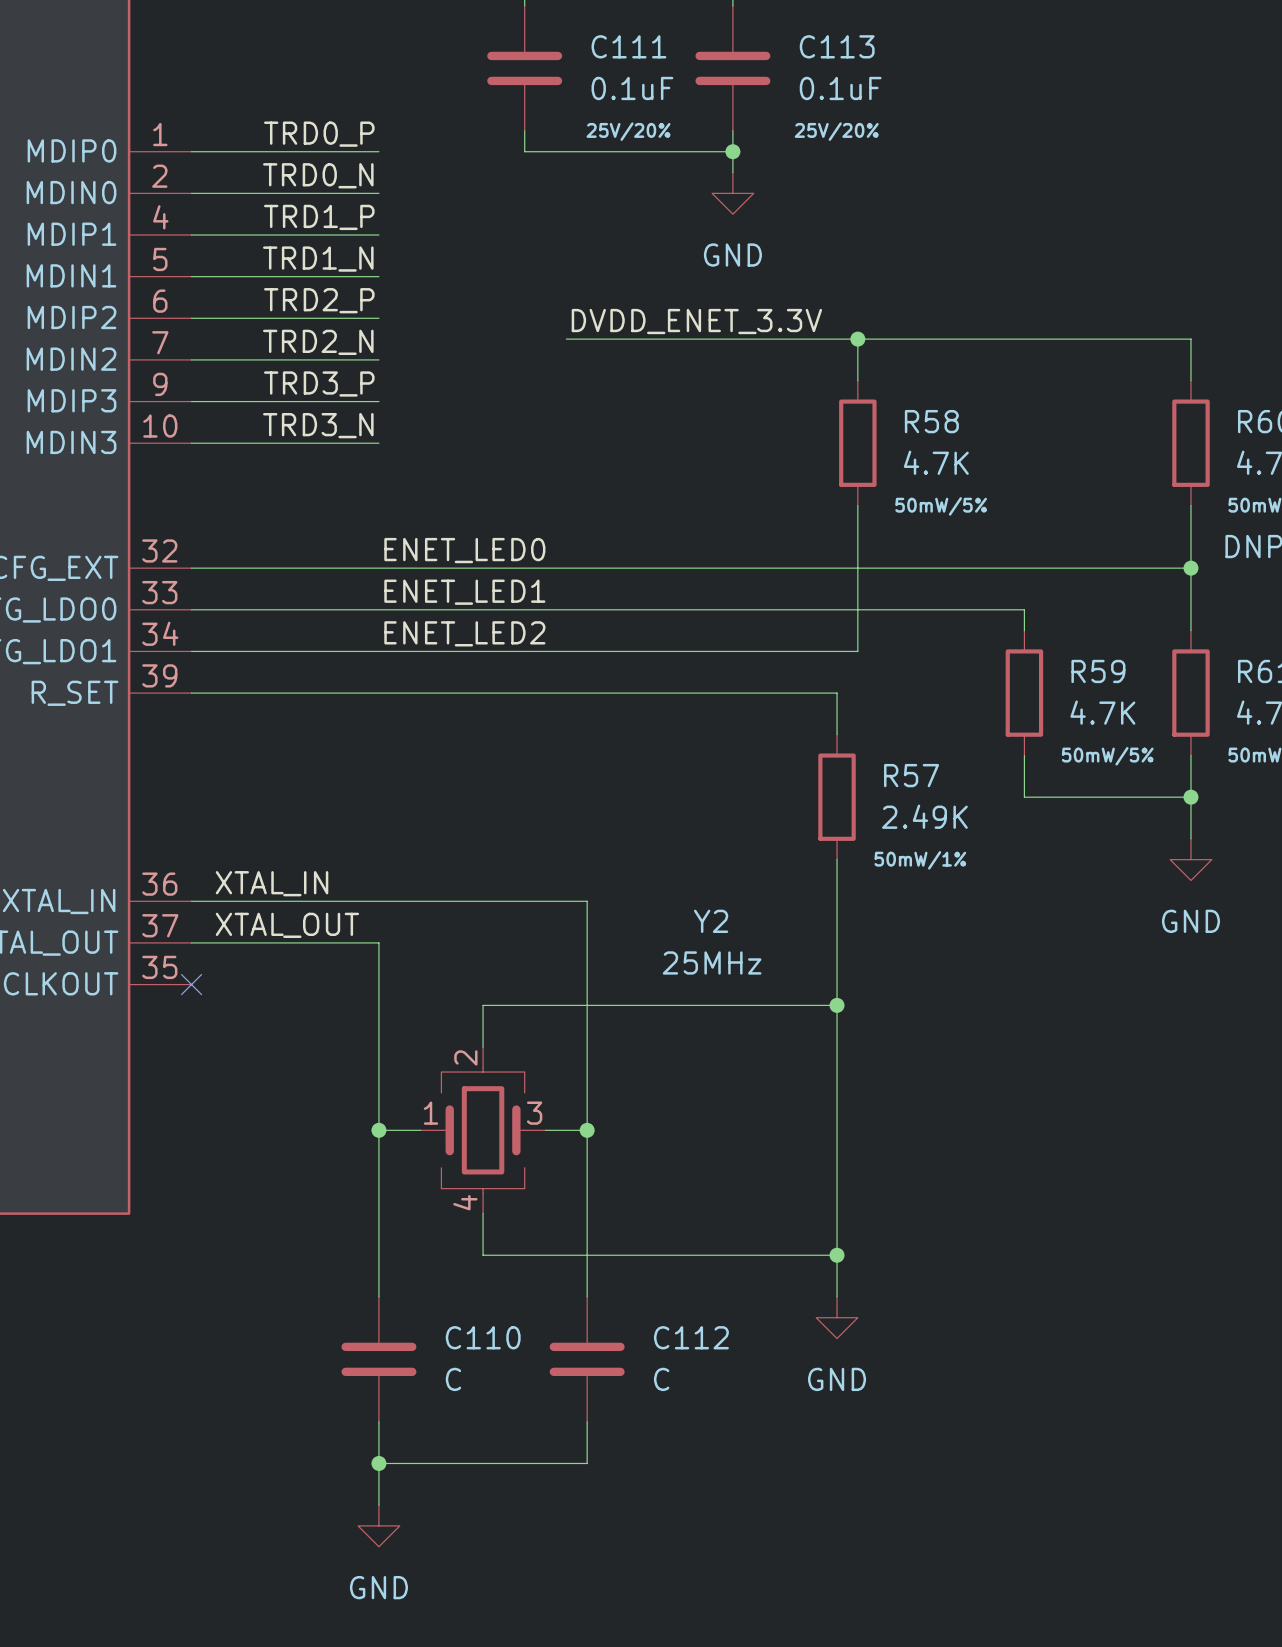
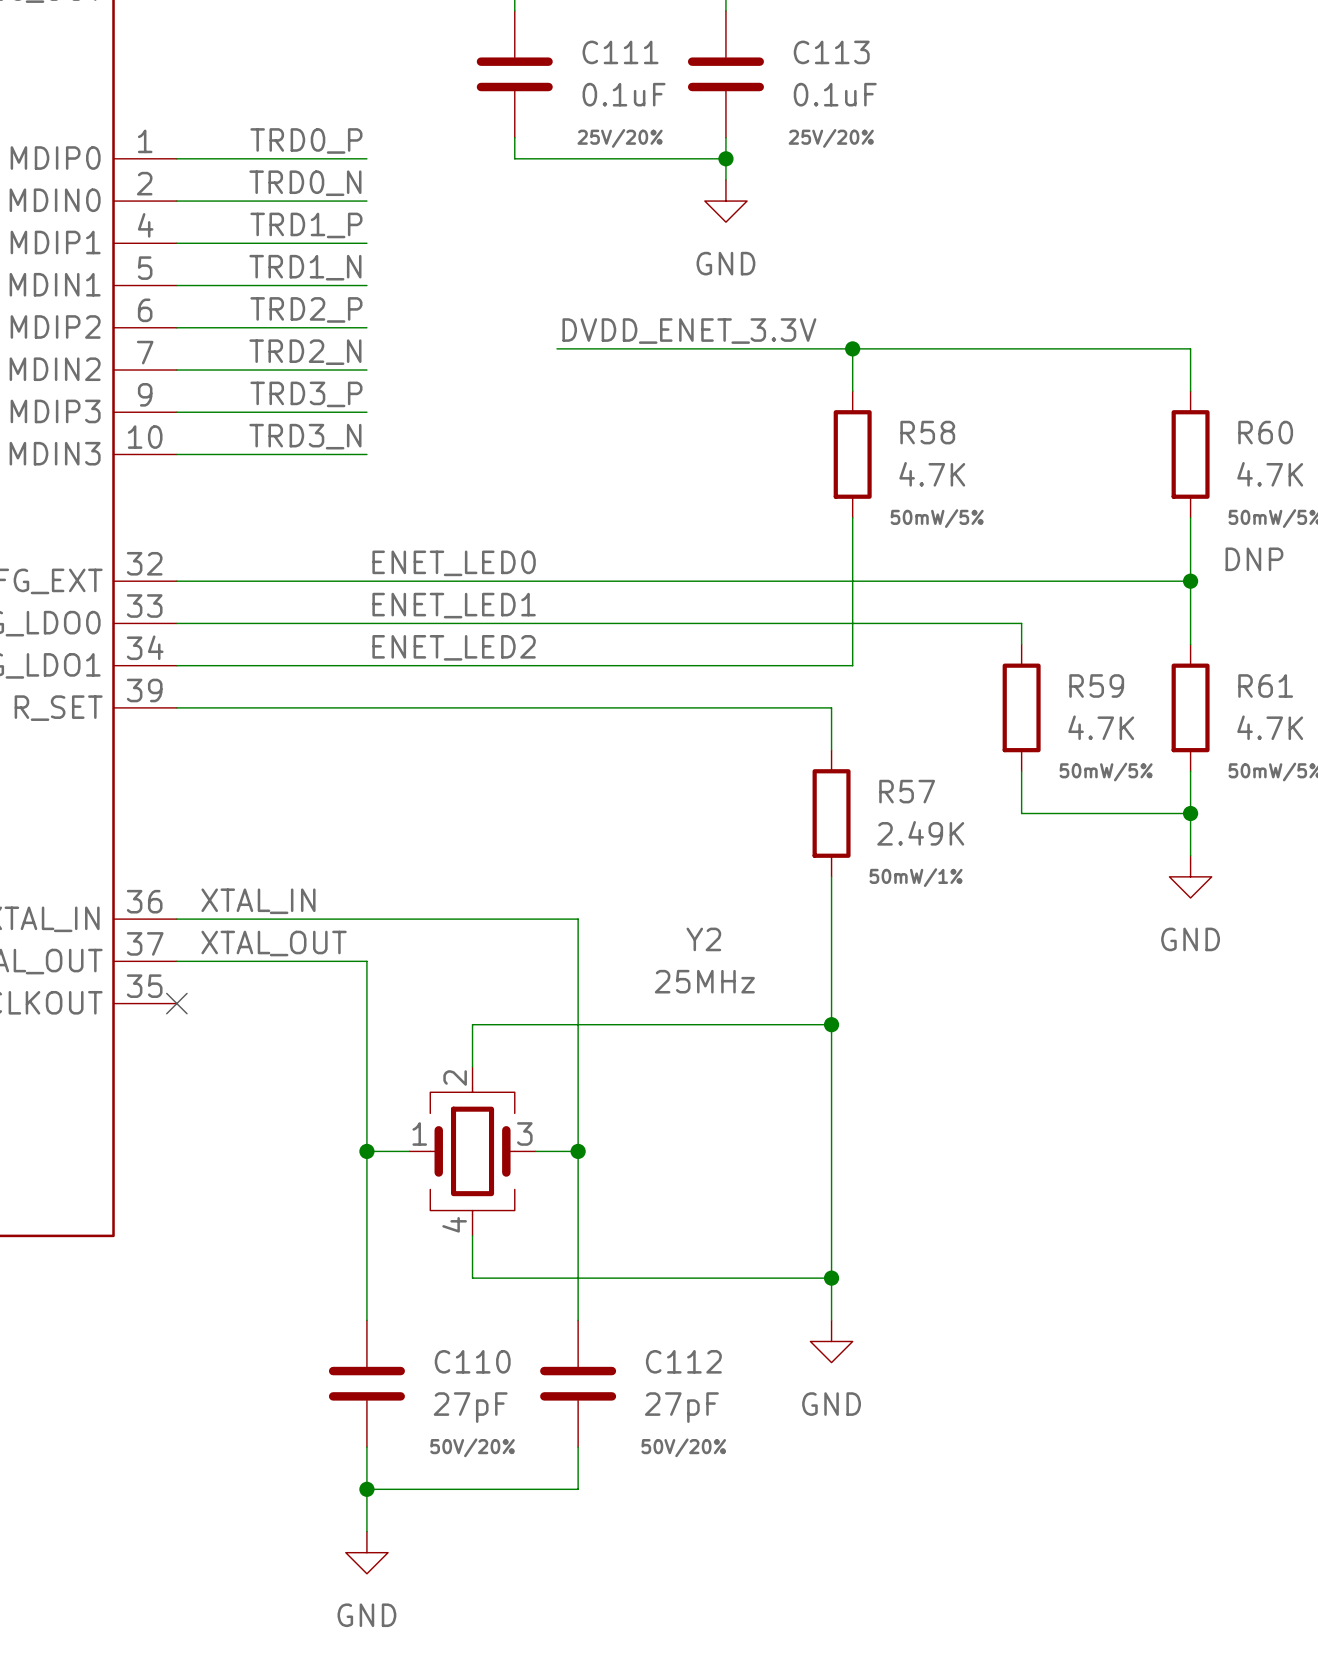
C110 value: C (453, 1379) -> 27pF (470, 1407)
C112 value: C (661, 1379) -> 27pF (681, 1407)
C110 text: none -> 50V/20% (472, 1447)
C112 text: none -> 50V/20% (683, 1447)

